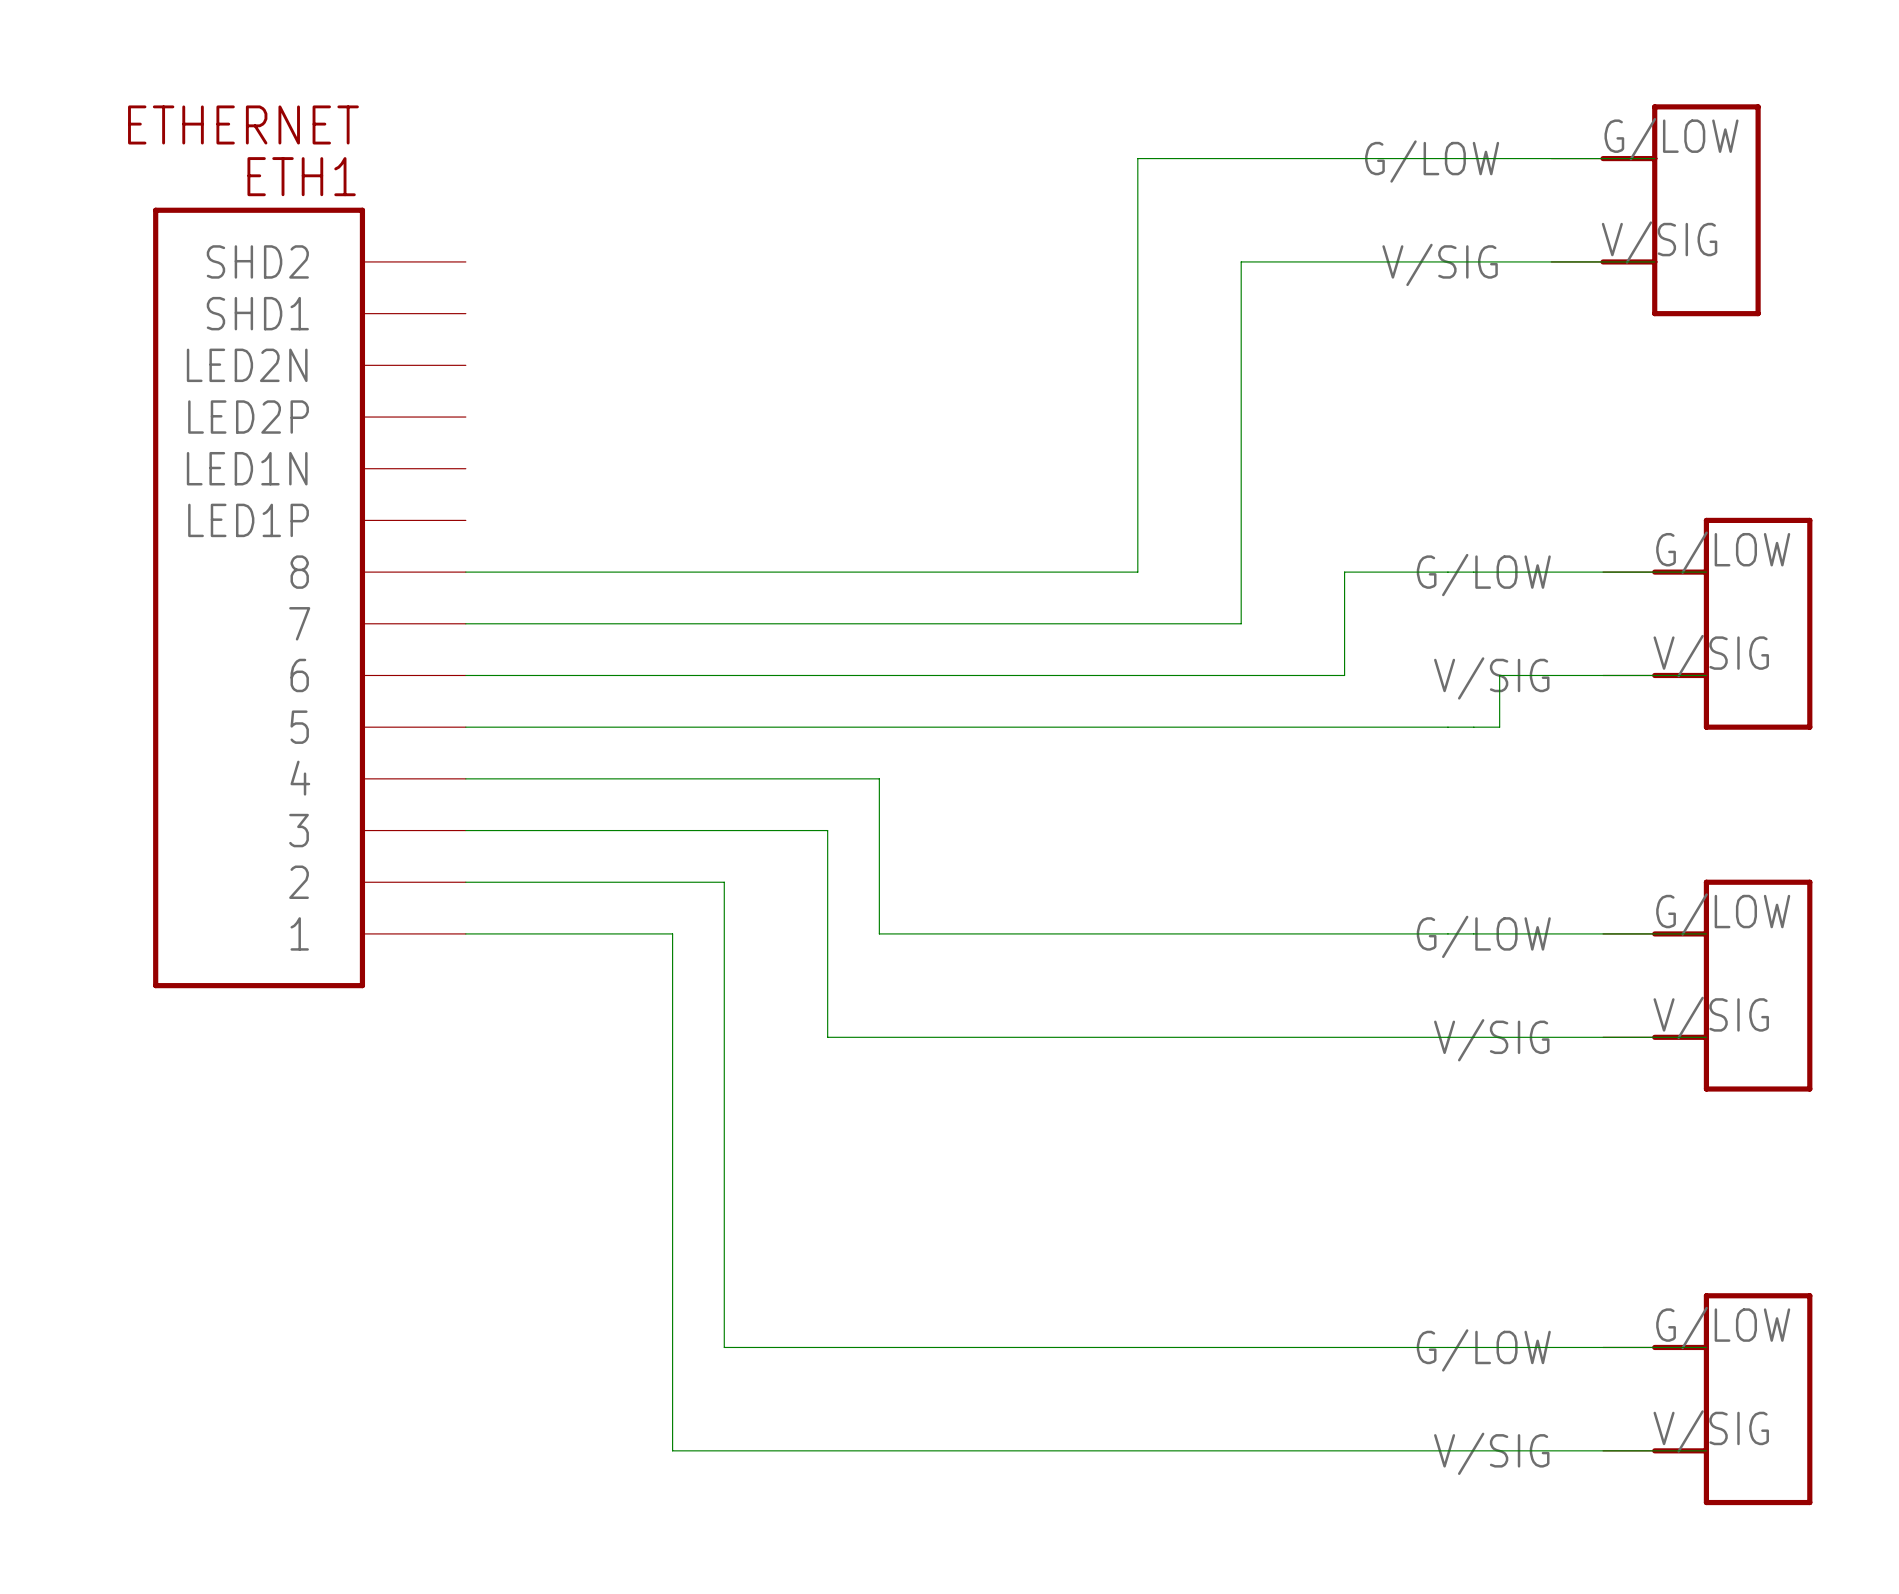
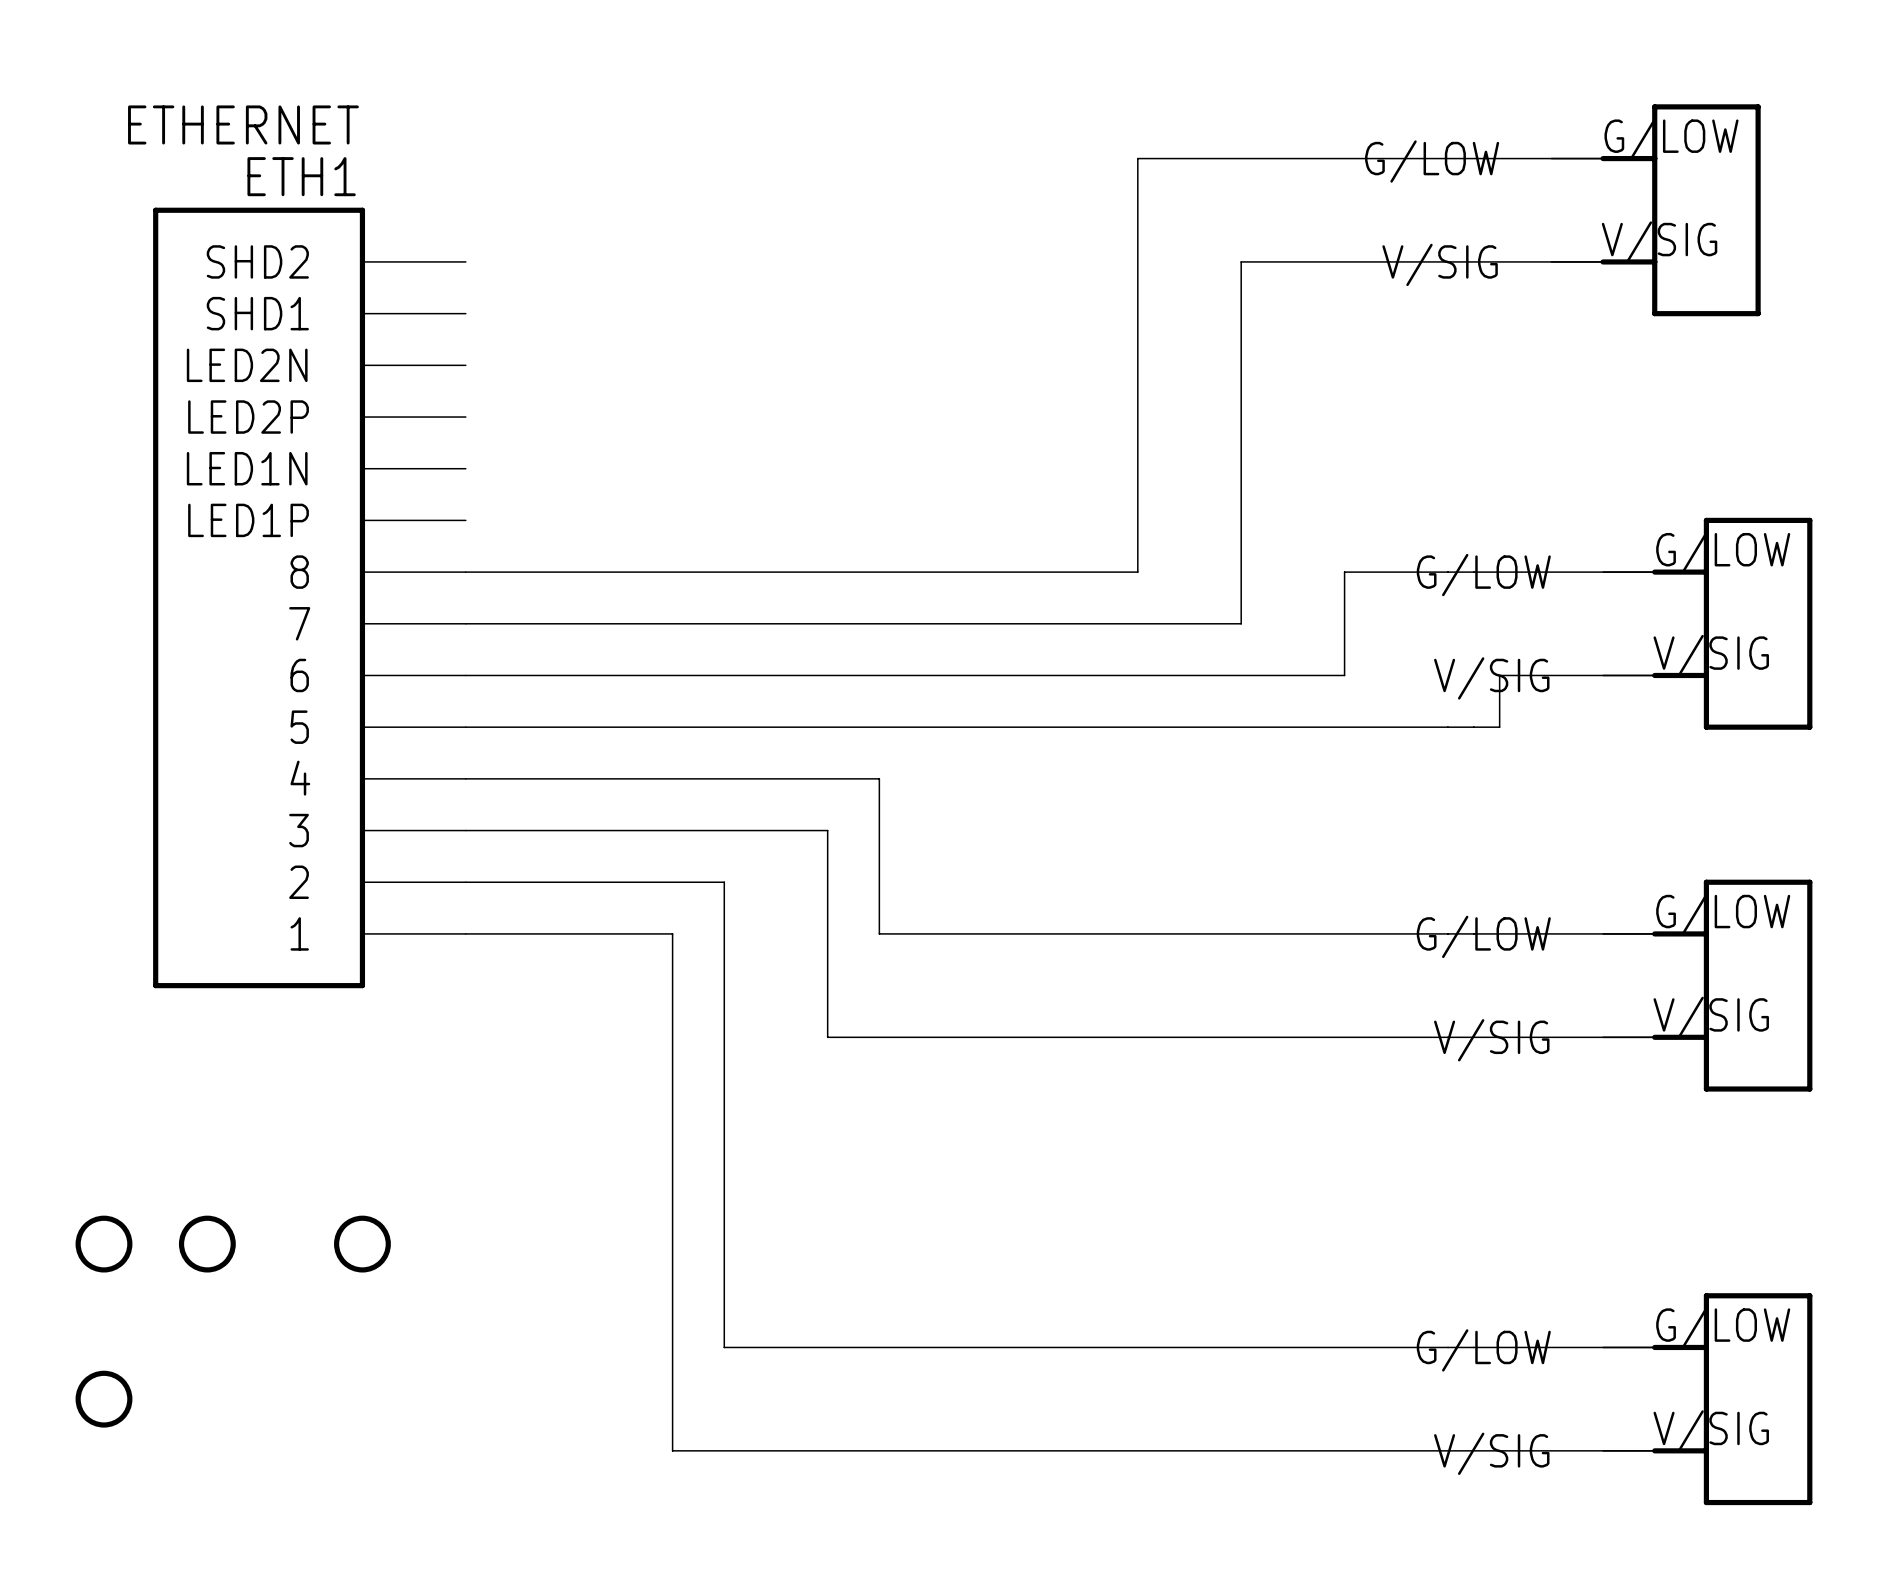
part: none -> (103, 1244)
part: none -> (207, 1244)
part: none -> (362, 1244)
part: none -> (103, 1399)

